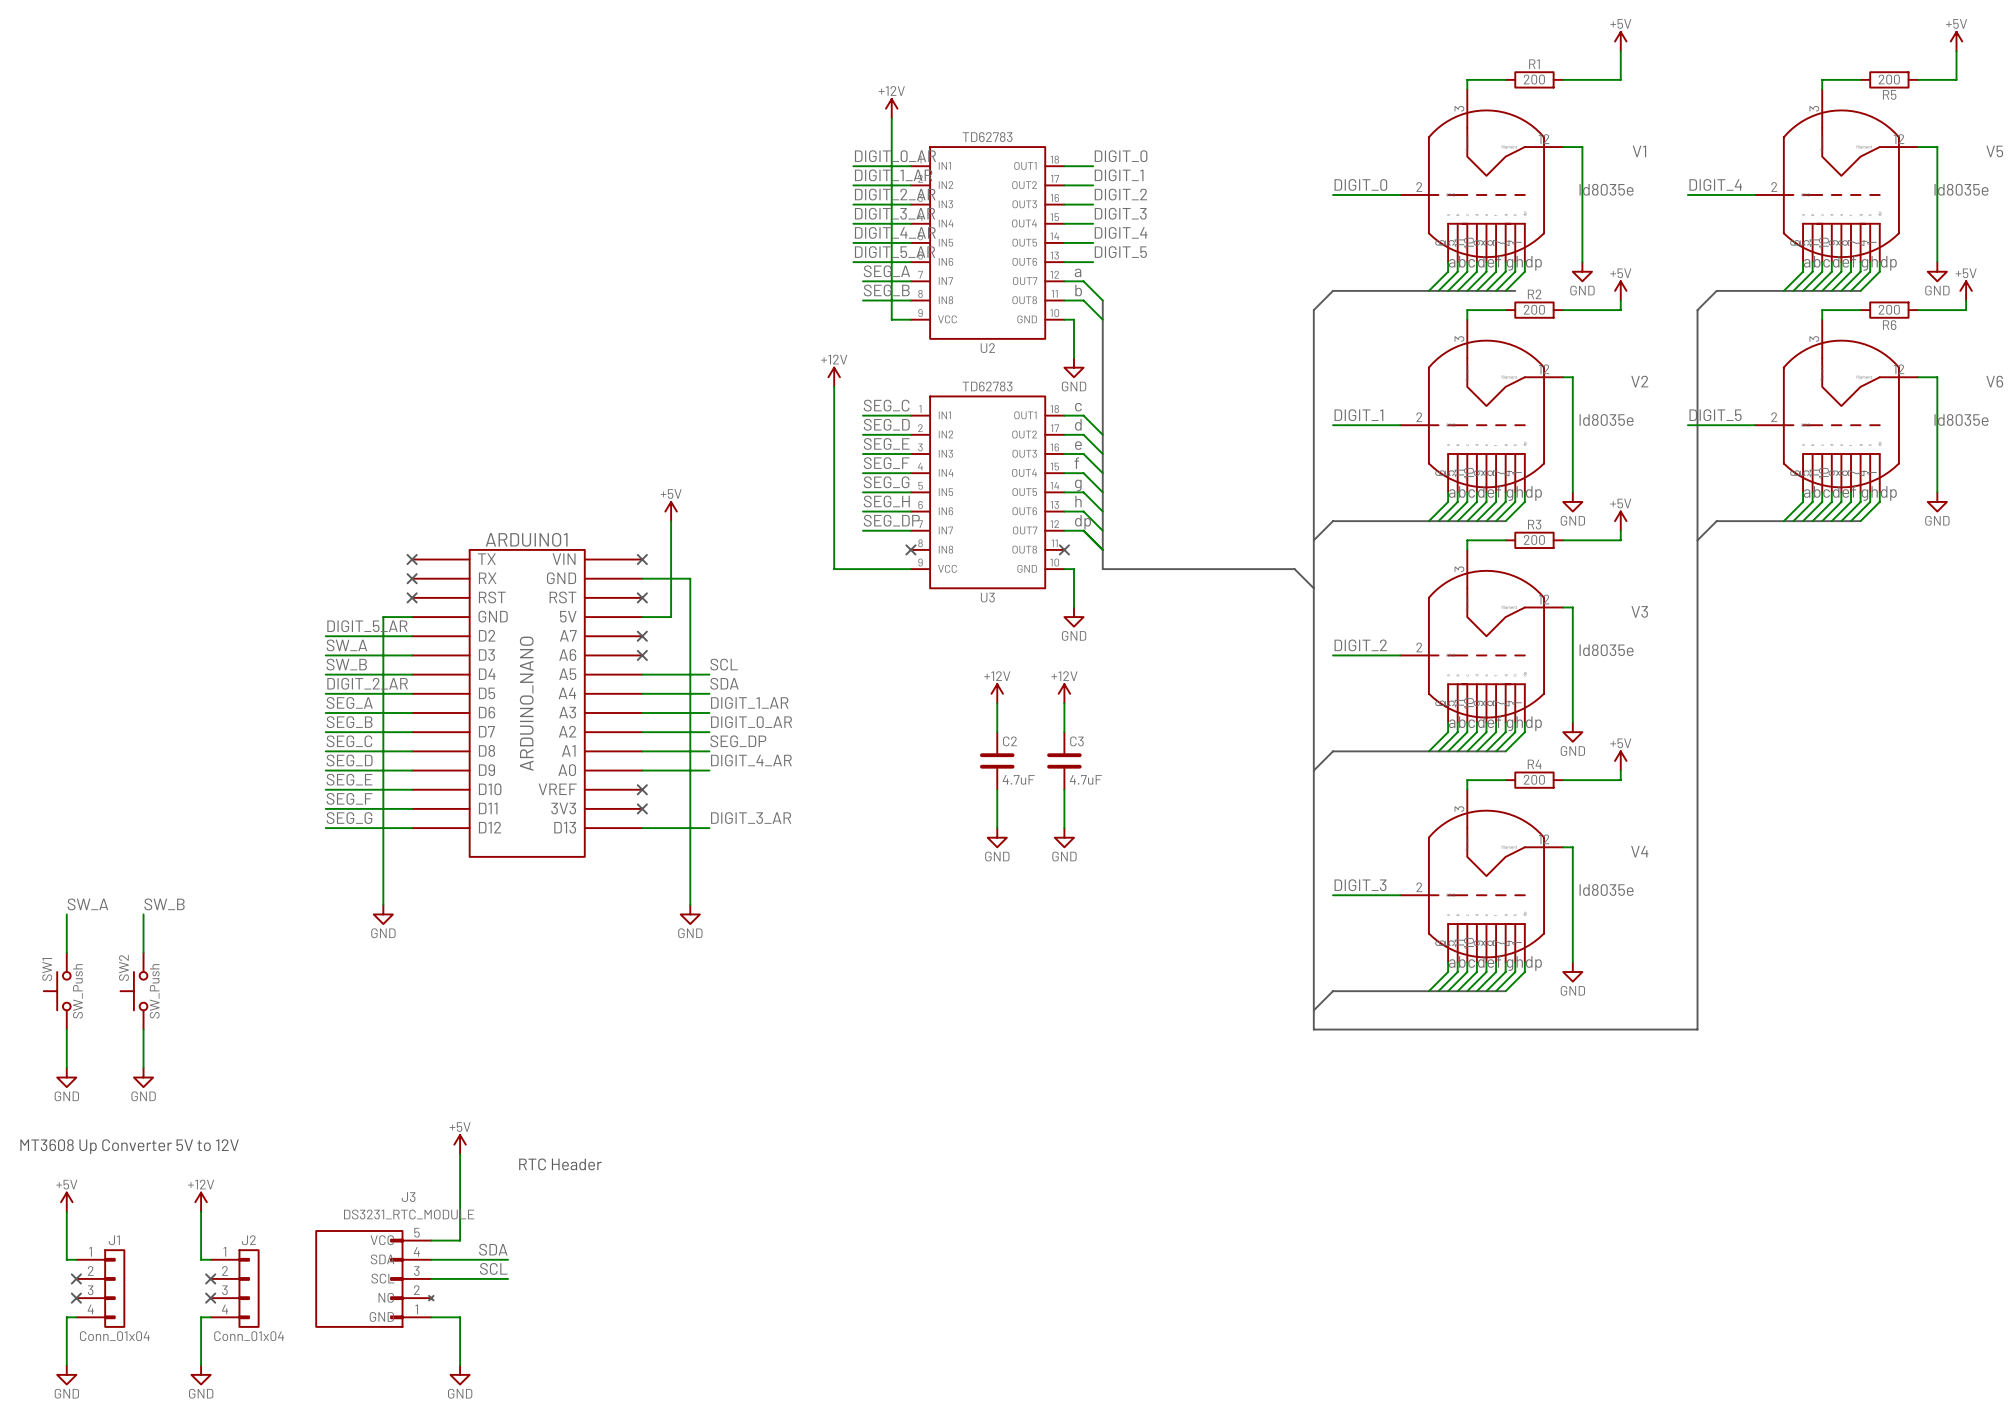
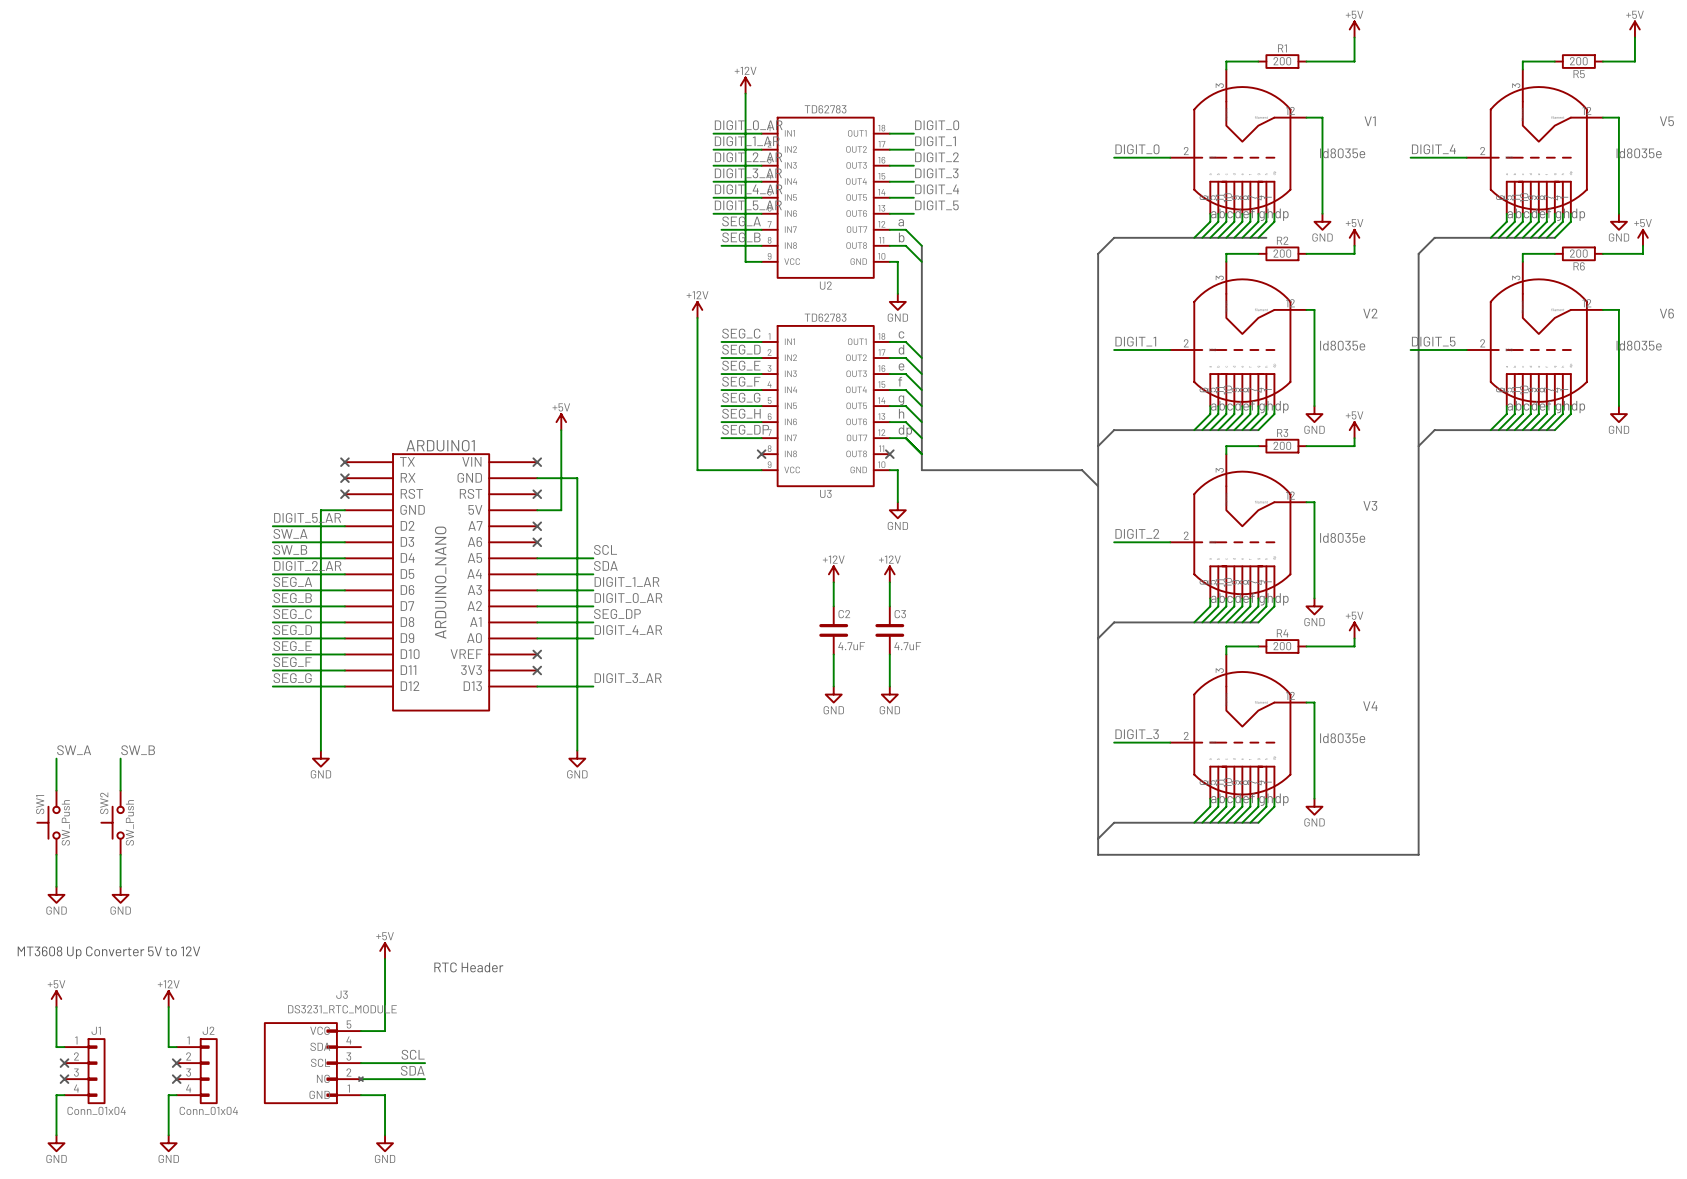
label position: SDA (493, 1249) -> SDA (412, 1070)
wire: (431, 1259) (508, 1259) -> (360, 1079) (425, 1079)

